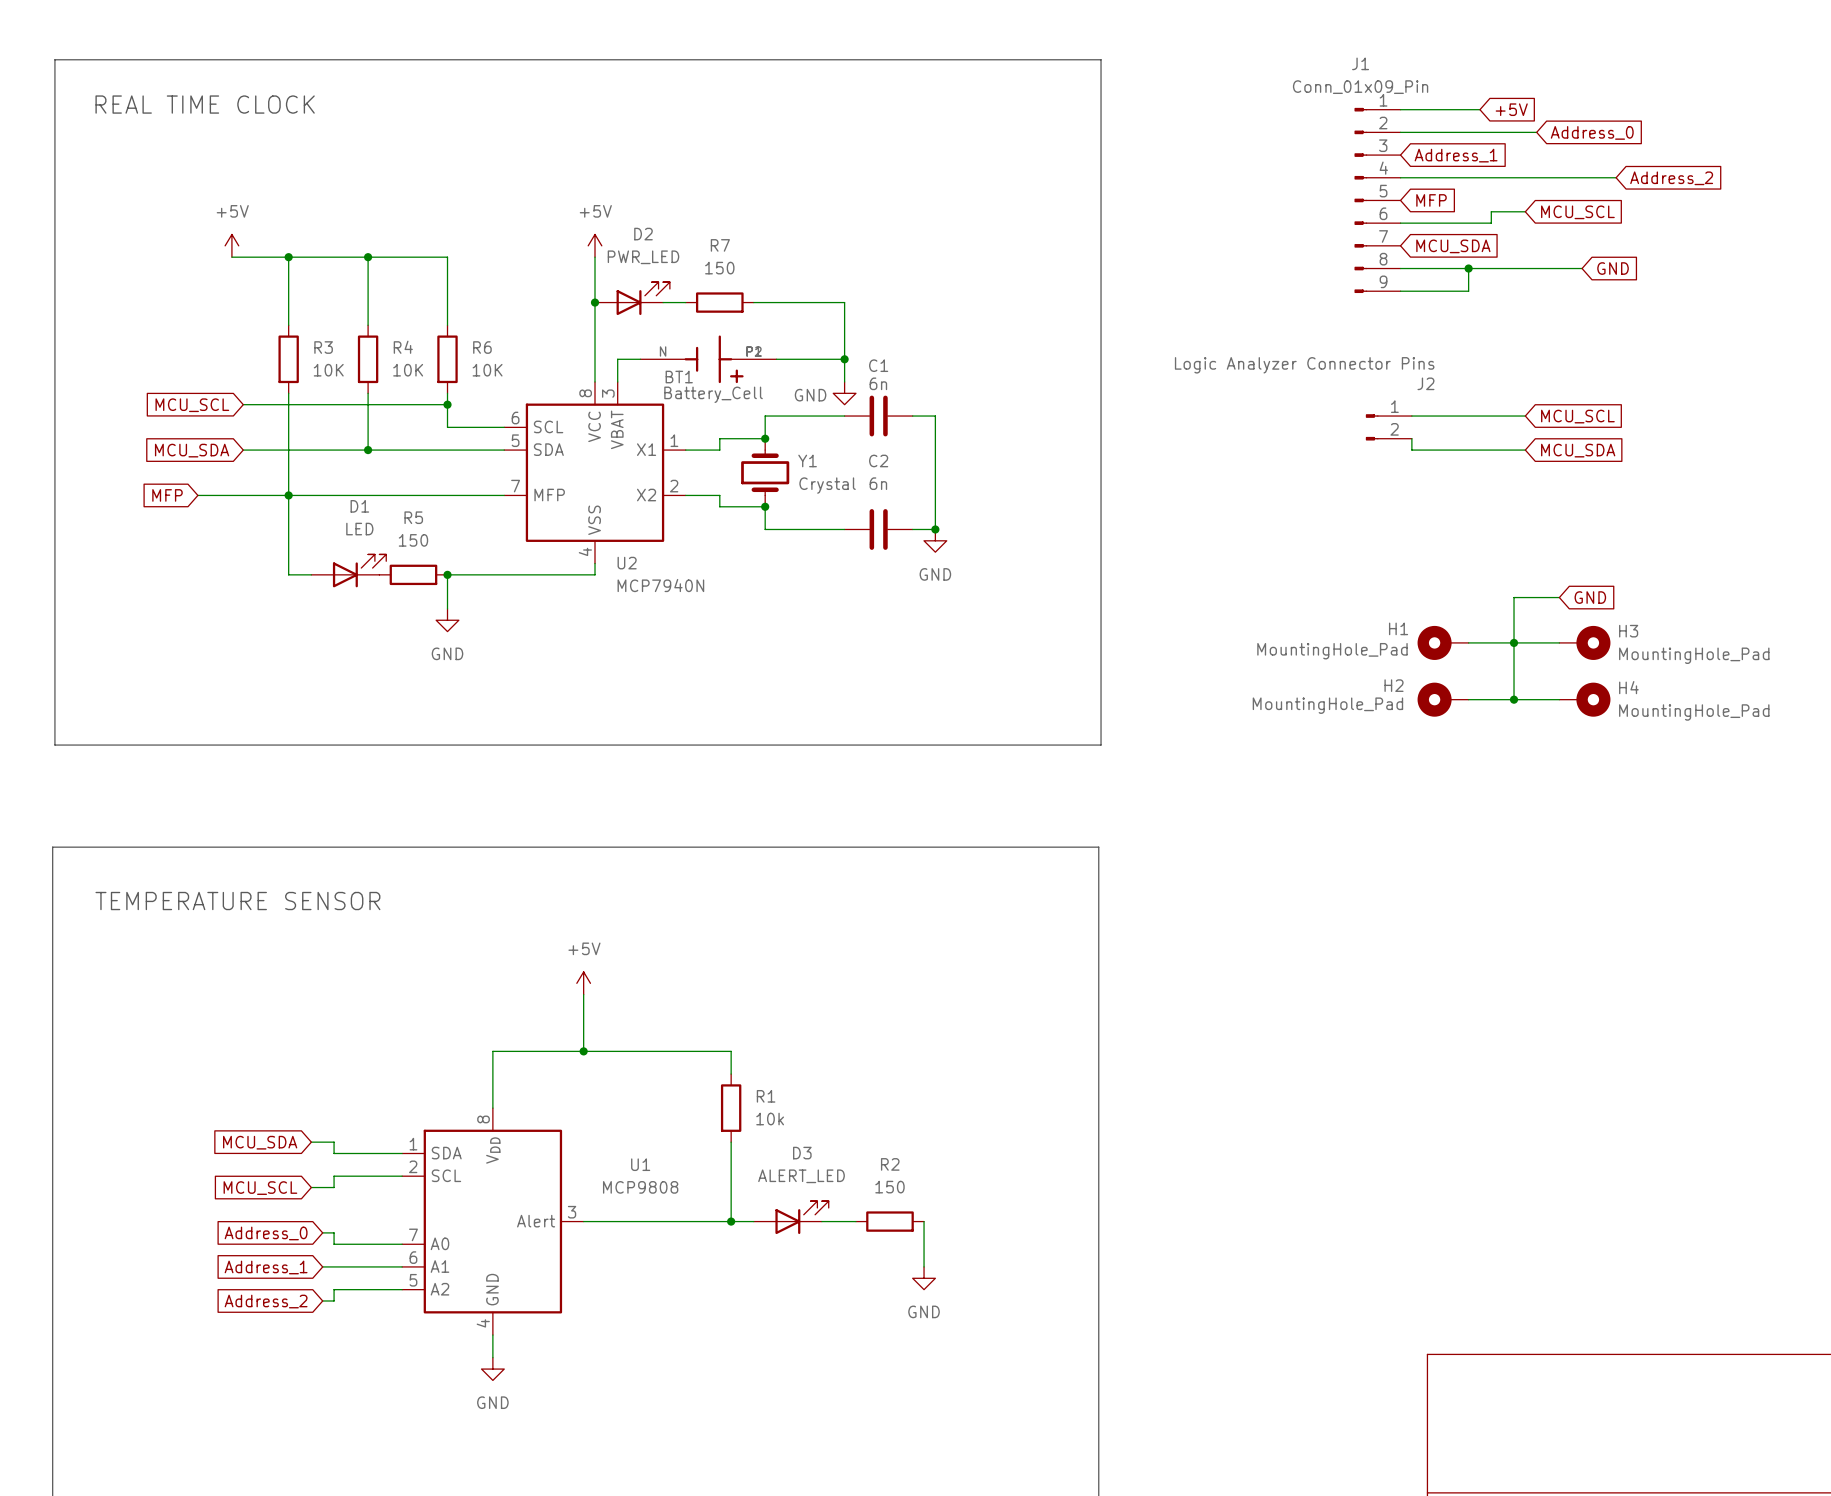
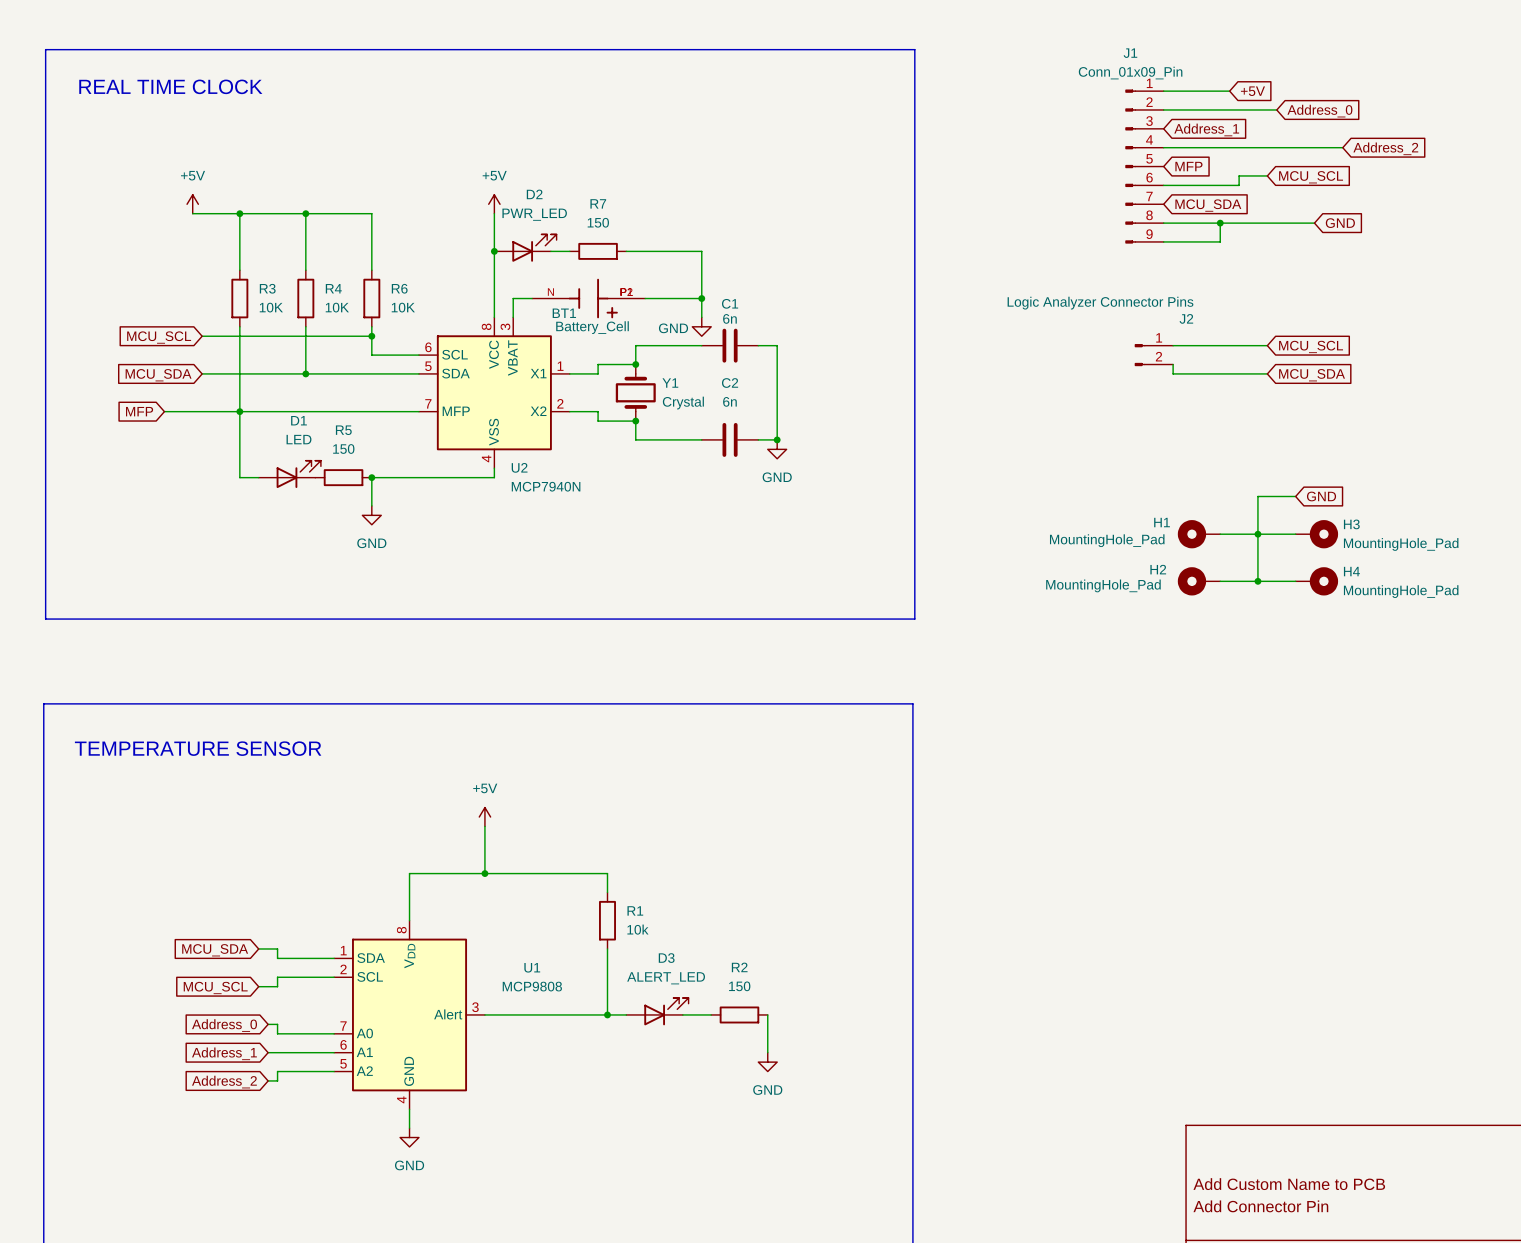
title block: none -> Add Custom Name to PCB (1289, 1184)
title block: none -> Add Connector Pin (1260, 1206)

